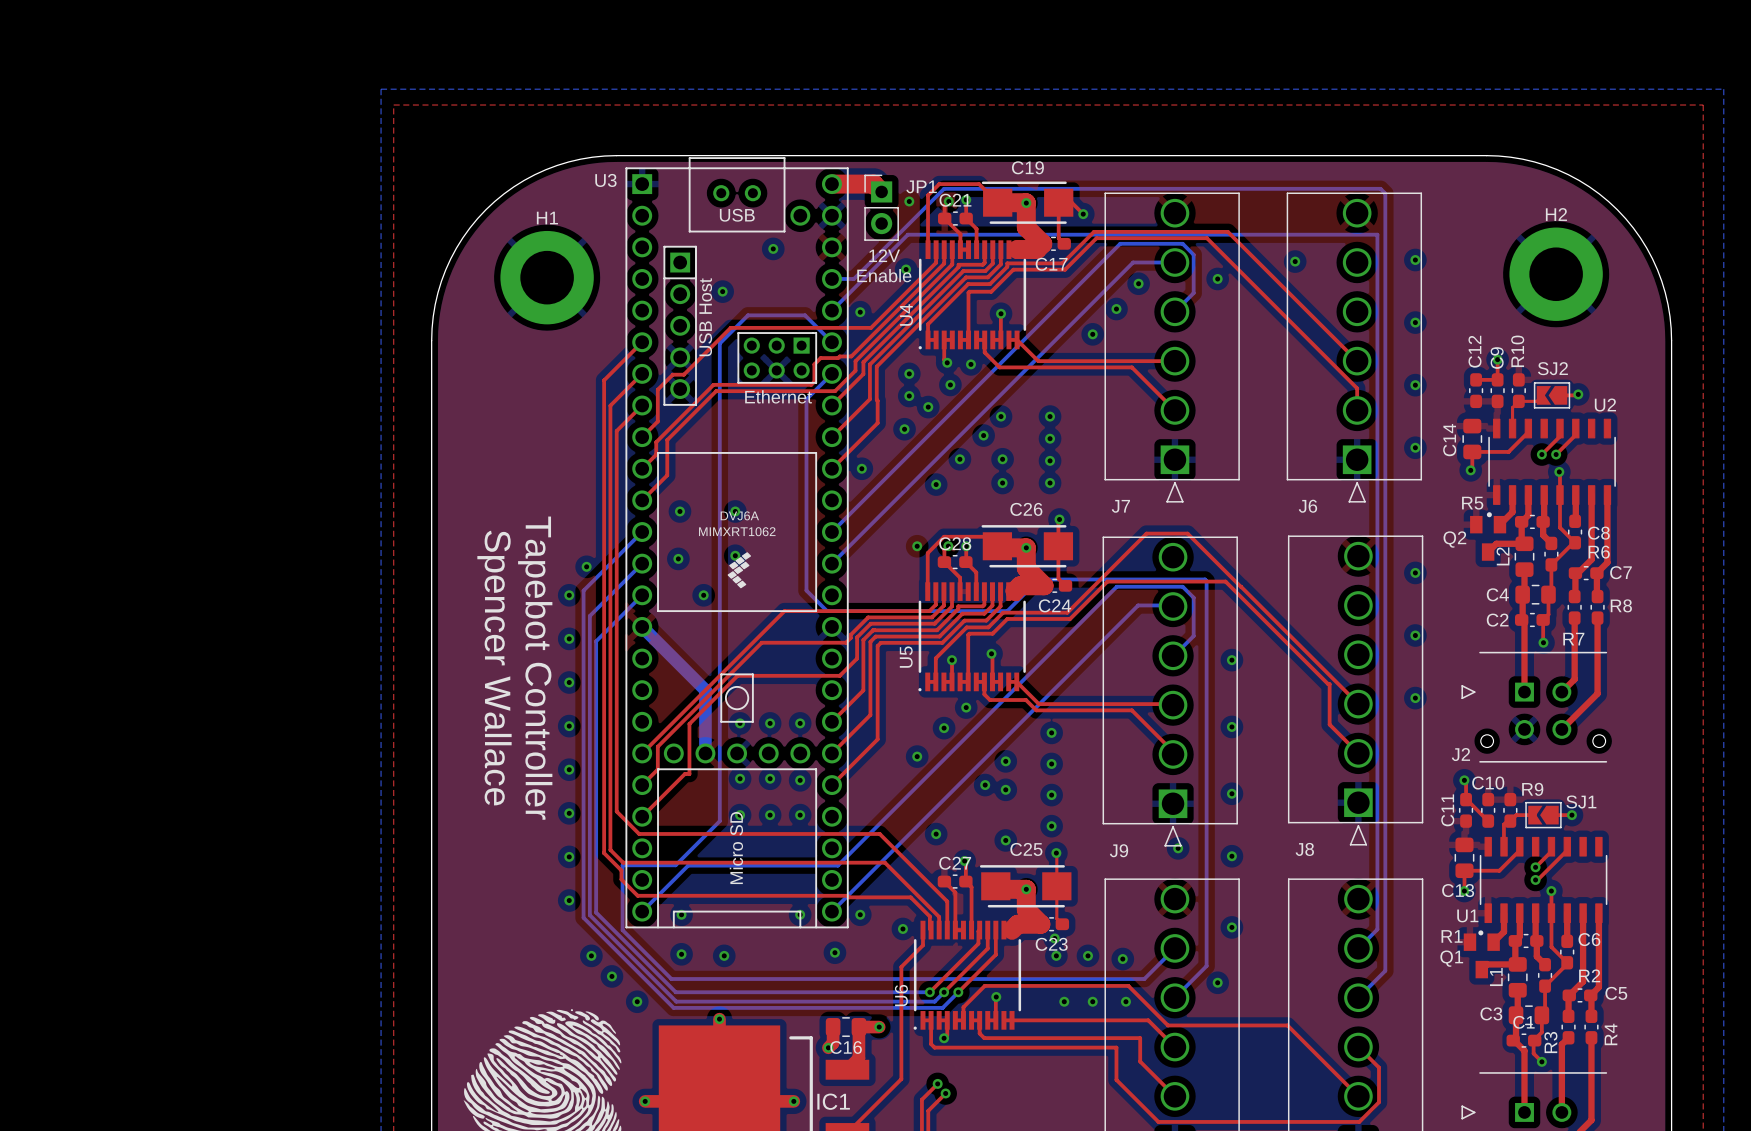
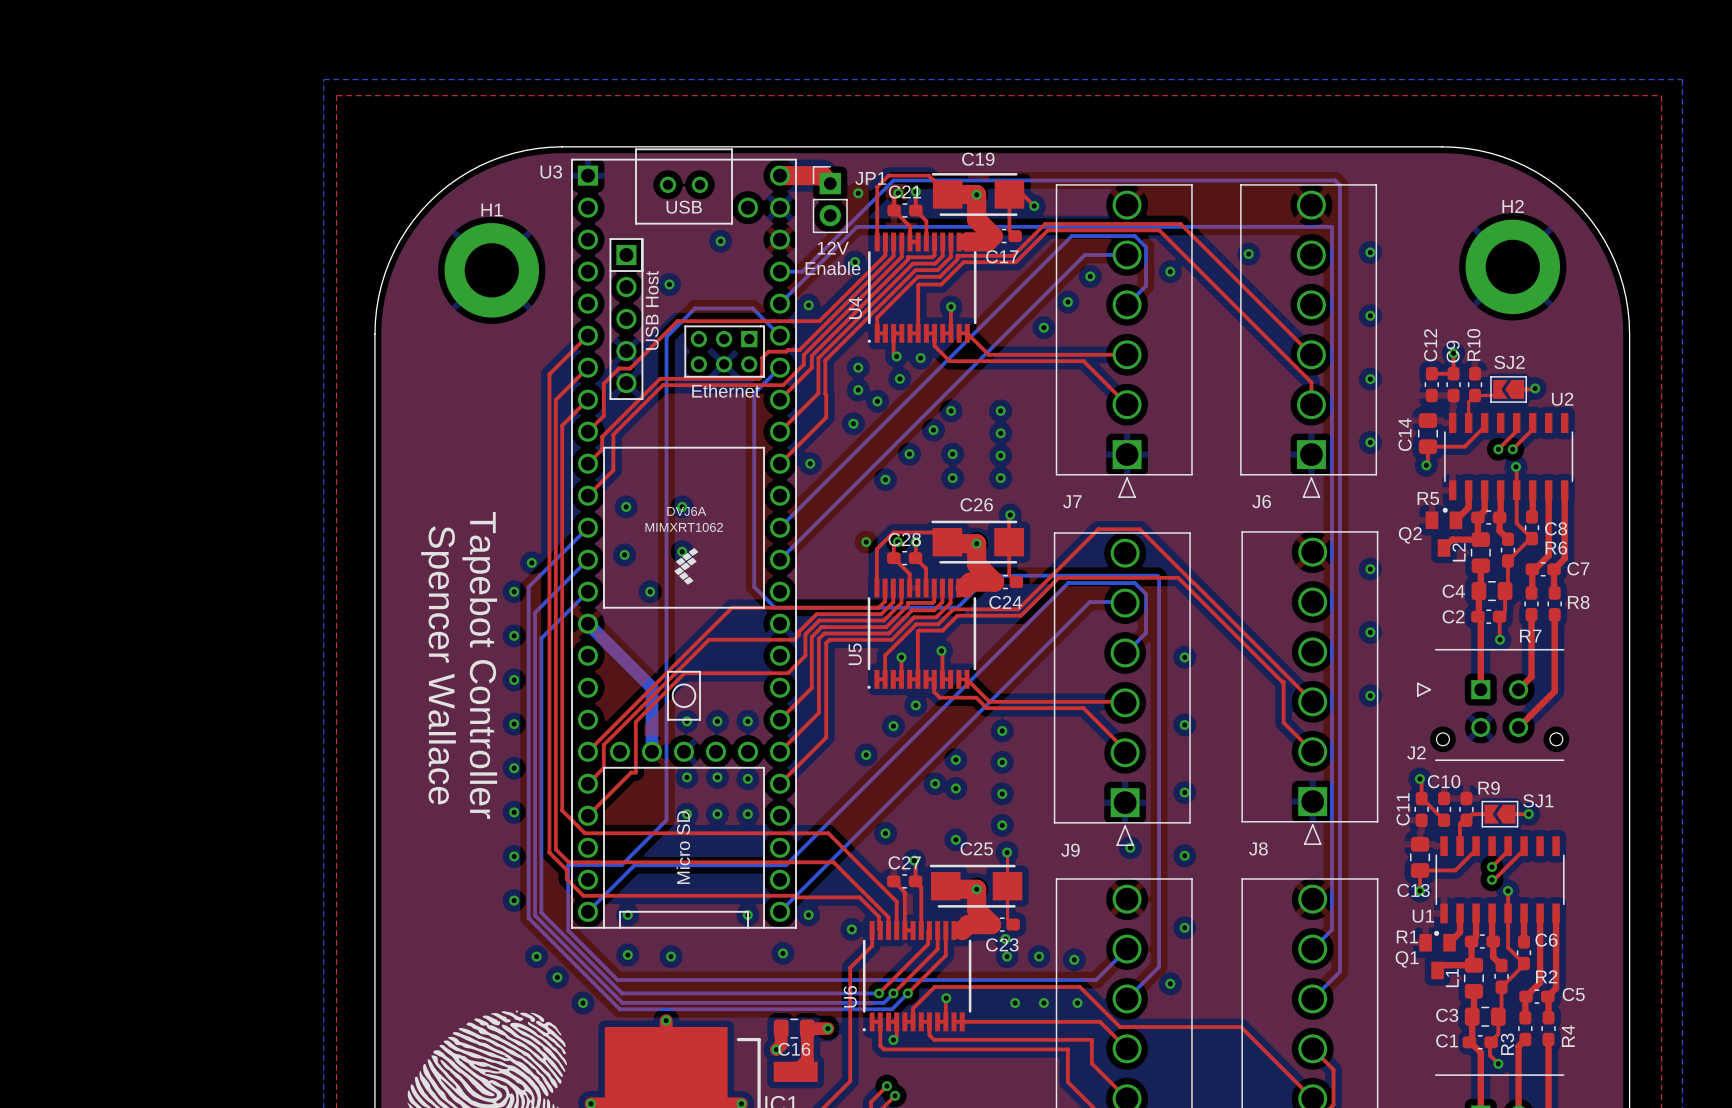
C1 name position: C1 (1523, 1022) -> C1 (1447, 1040)

